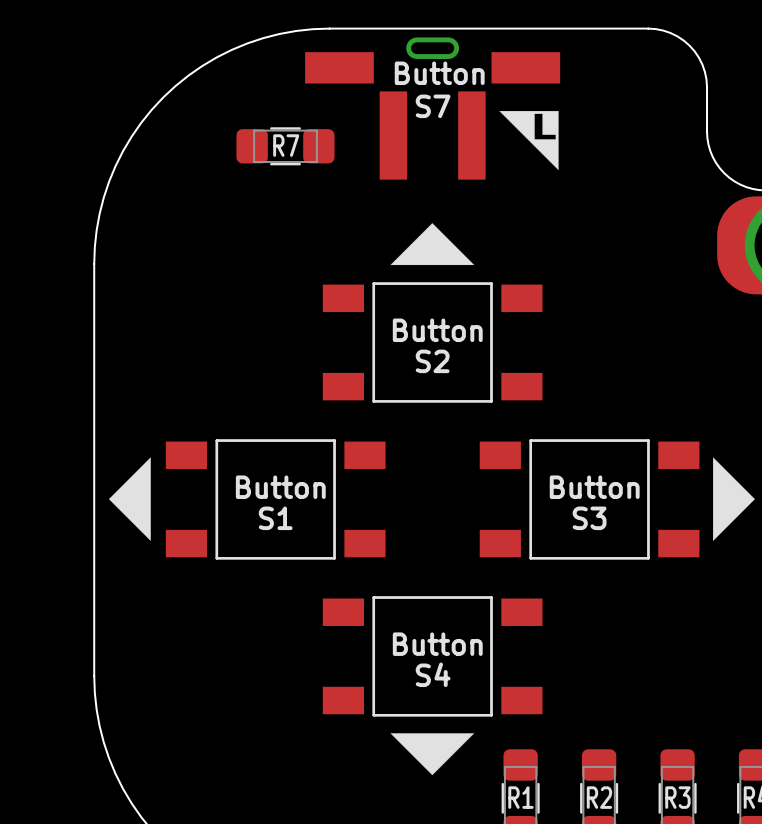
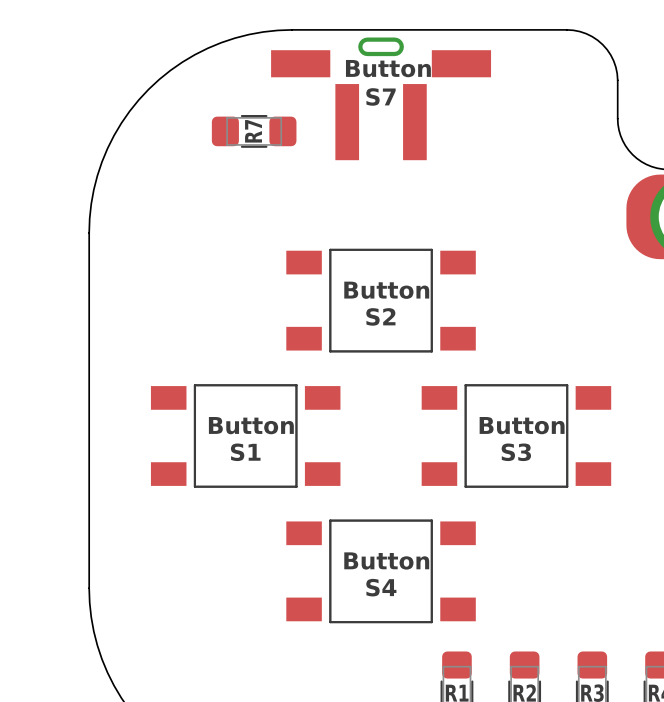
drawing: [499, 110, 559, 171] -> none
R7 name rotation: 0° (286, 145) -> 90° counterclockwise (253, 131)
drawing: [390, 223, 475, 266] -> none
drawing: [108, 457, 151, 541] -> none
drawing: [713, 457, 755, 541] -> none
drawing: [390, 733, 475, 776] -> none

